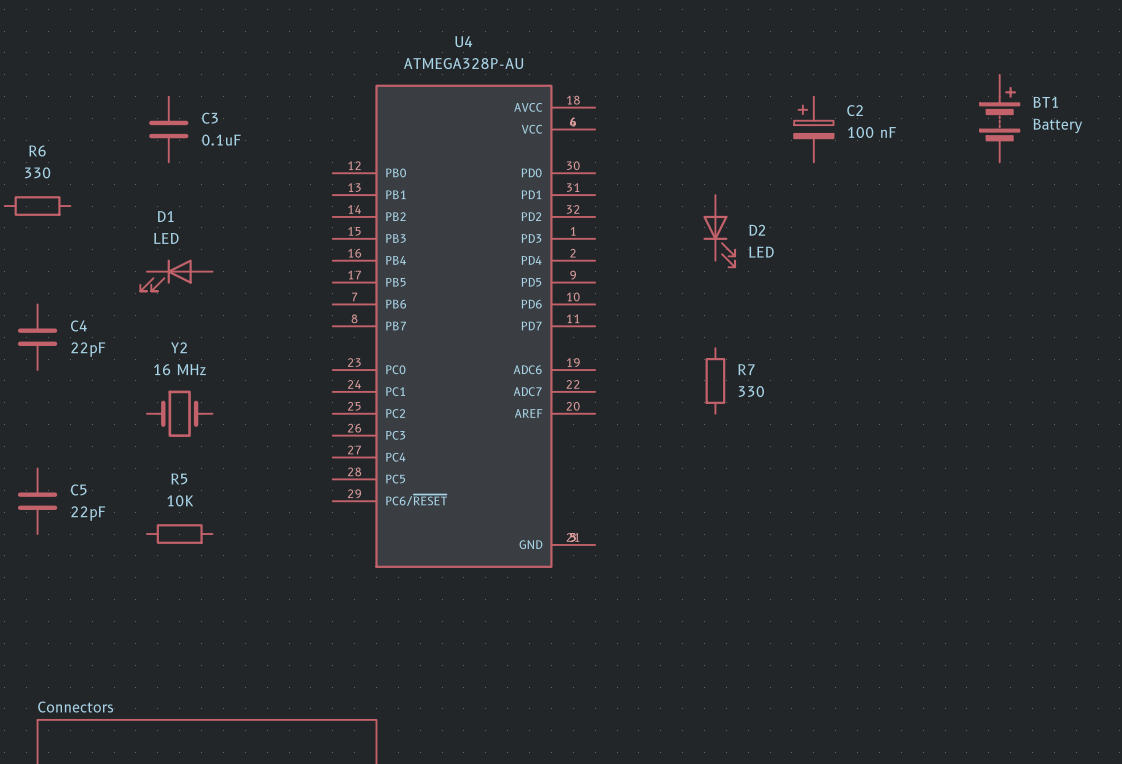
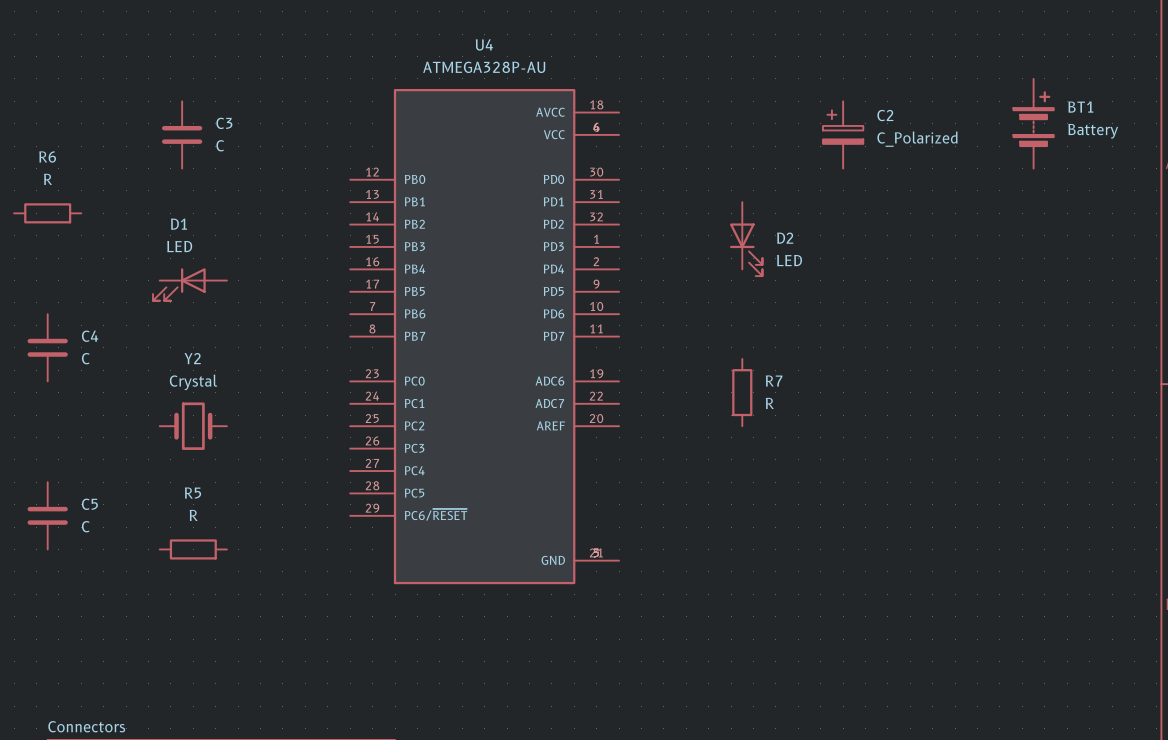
C2 value: 100 nF (871, 132) -> C_Polarized (917, 139)
C3 value: 0.1uF (221, 140) -> C (220, 145)
R6 value: 330 (37, 172) -> R (48, 179)
C4 value: 22pF (88, 349) -> C (85, 358)
Y2 value: 16 MHz (180, 369) -> Crystal (193, 382)
R7 value: 330 (751, 391) -> R (769, 403)
R5 value: 10K (180, 500) -> R (193, 515)
C5 value: 22pF (88, 513) -> C (85, 526)

